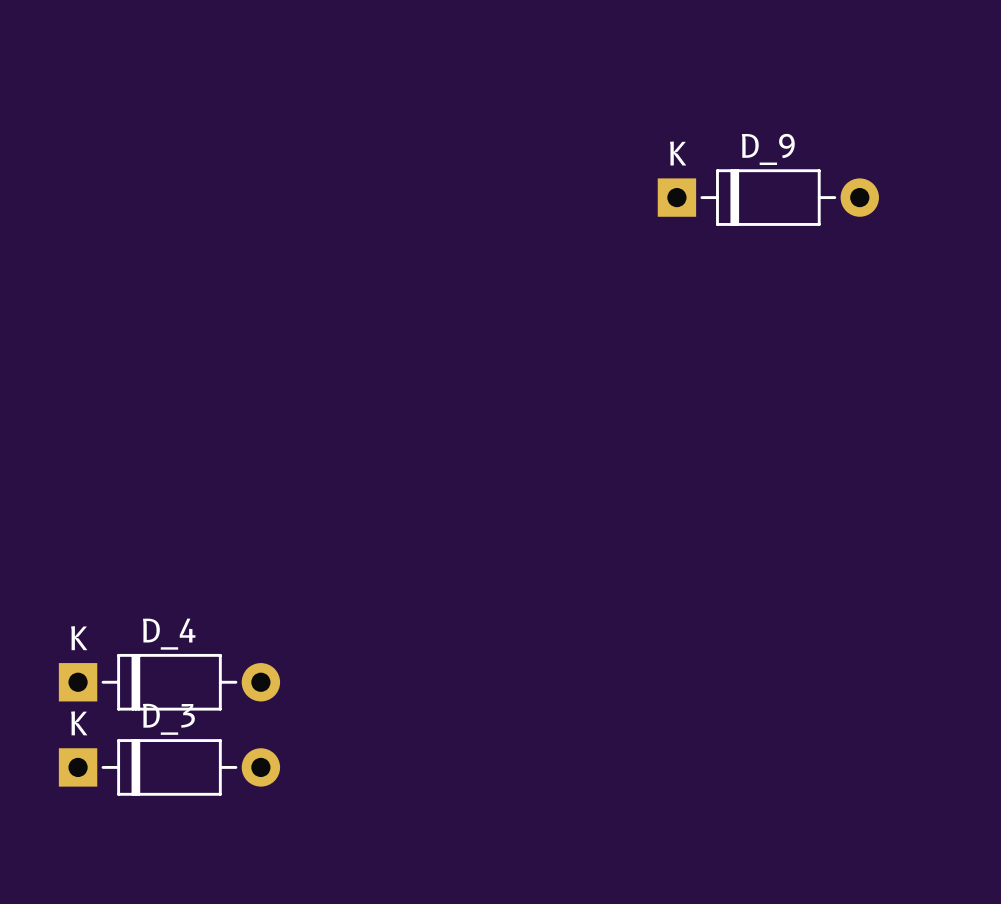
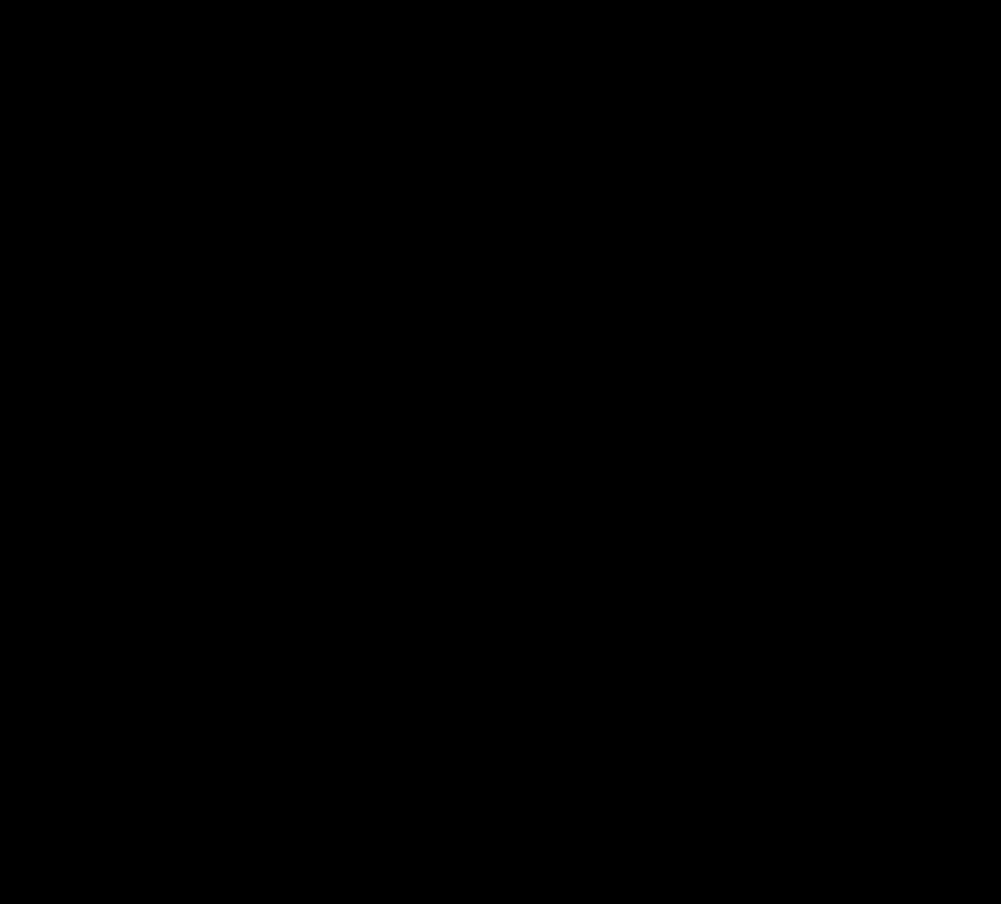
D_9: (768, 197) -> none
D_4: (169, 682) -> none
D_3: (169, 767) -> none

